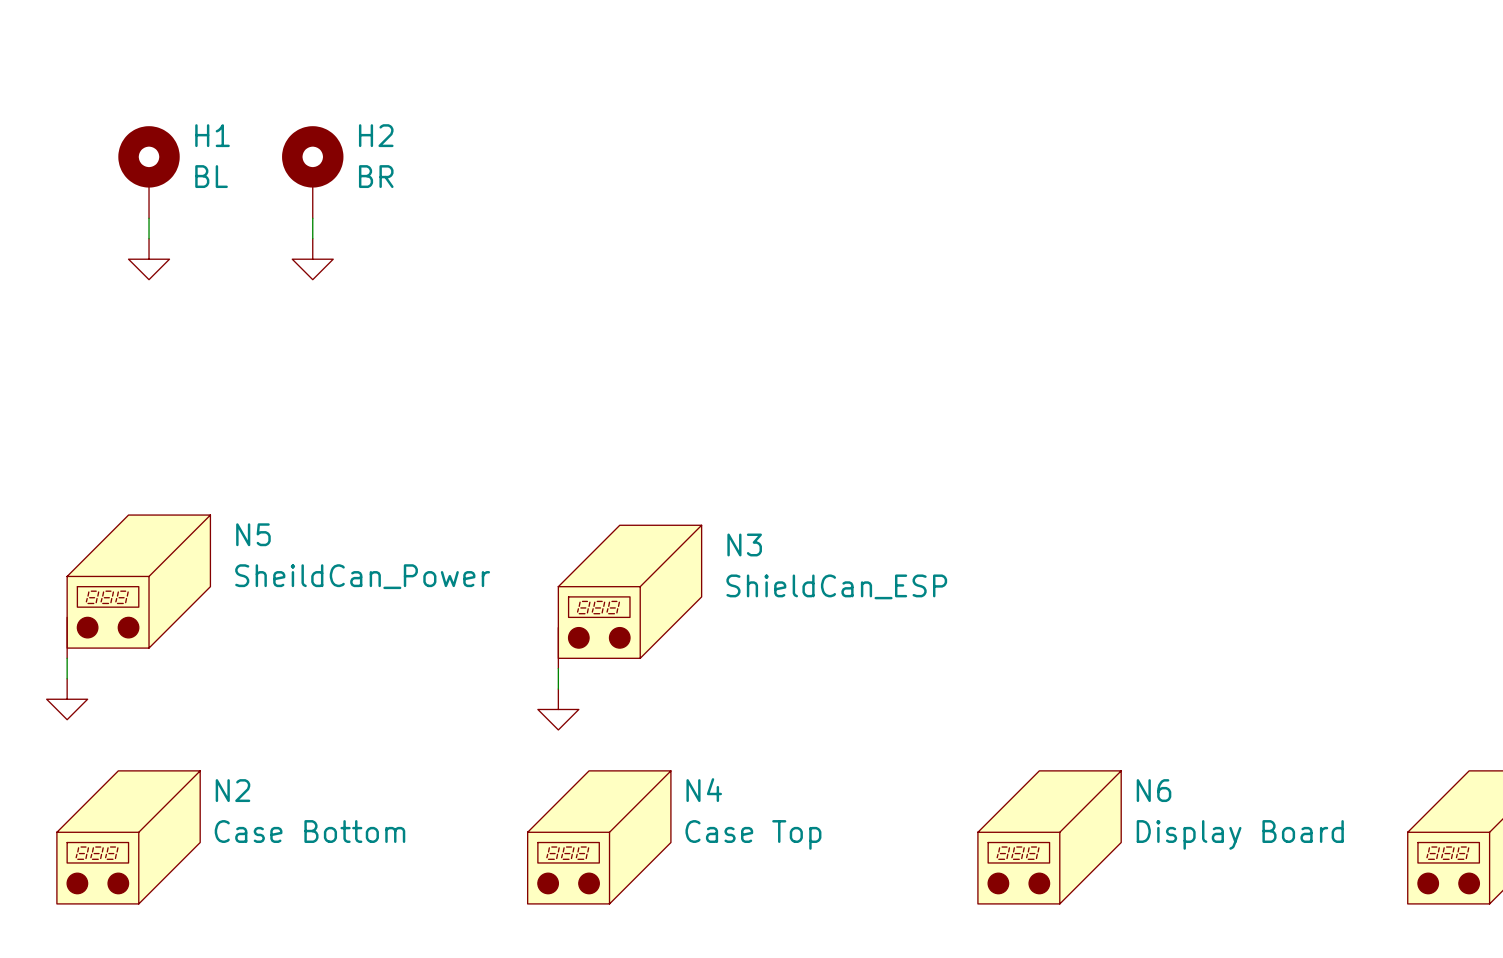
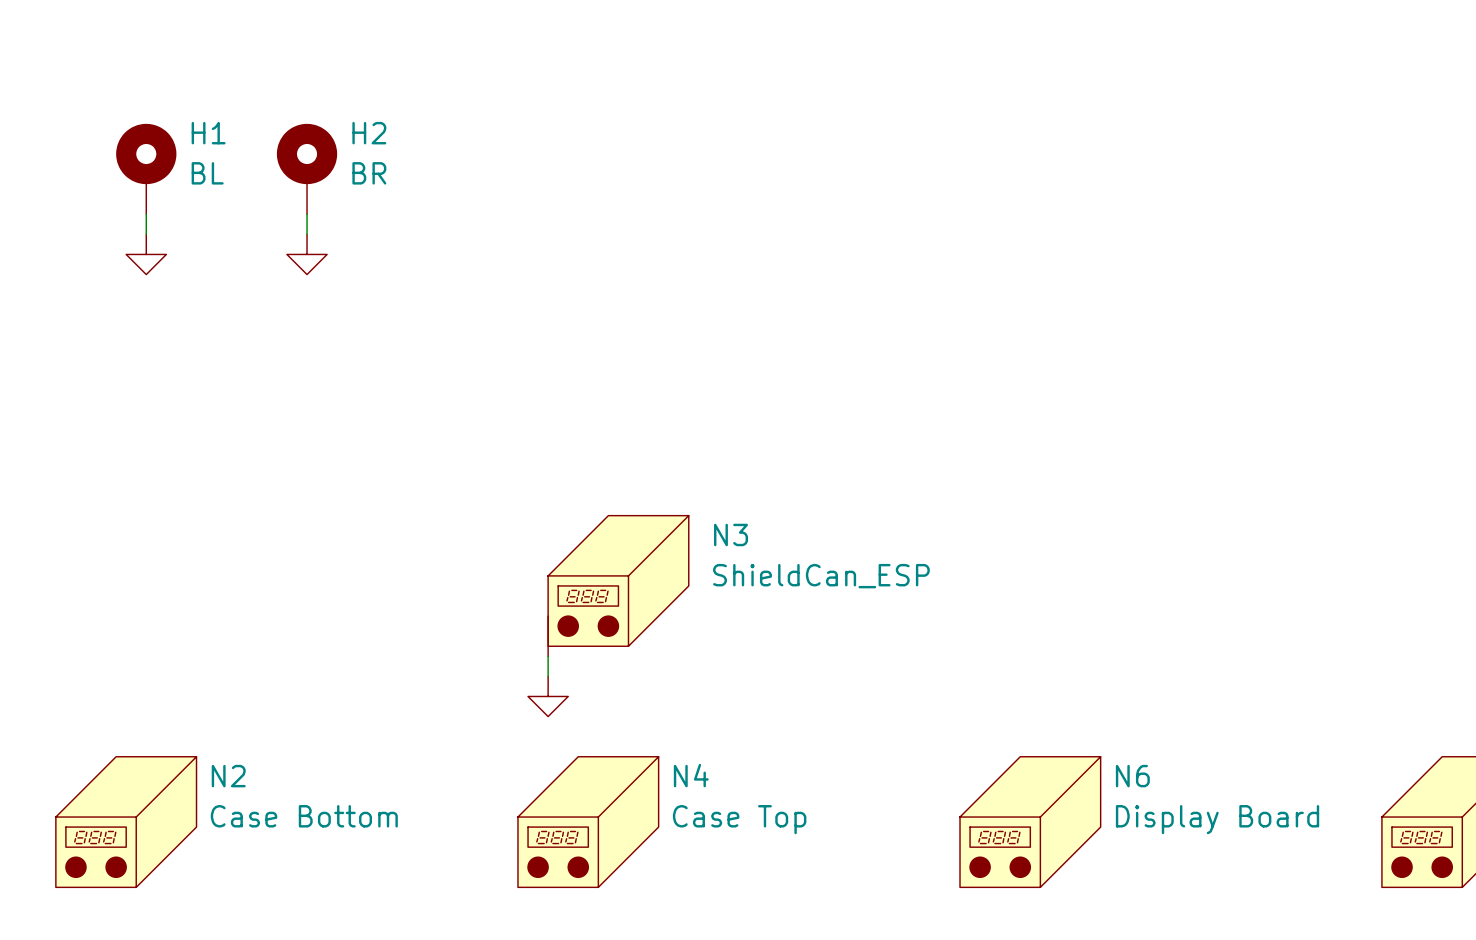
N5: SheildCan_Power (138, 586) -> none
wire: (67, 658) (67, 678) -> none
power symbol: (67, 699) -> none

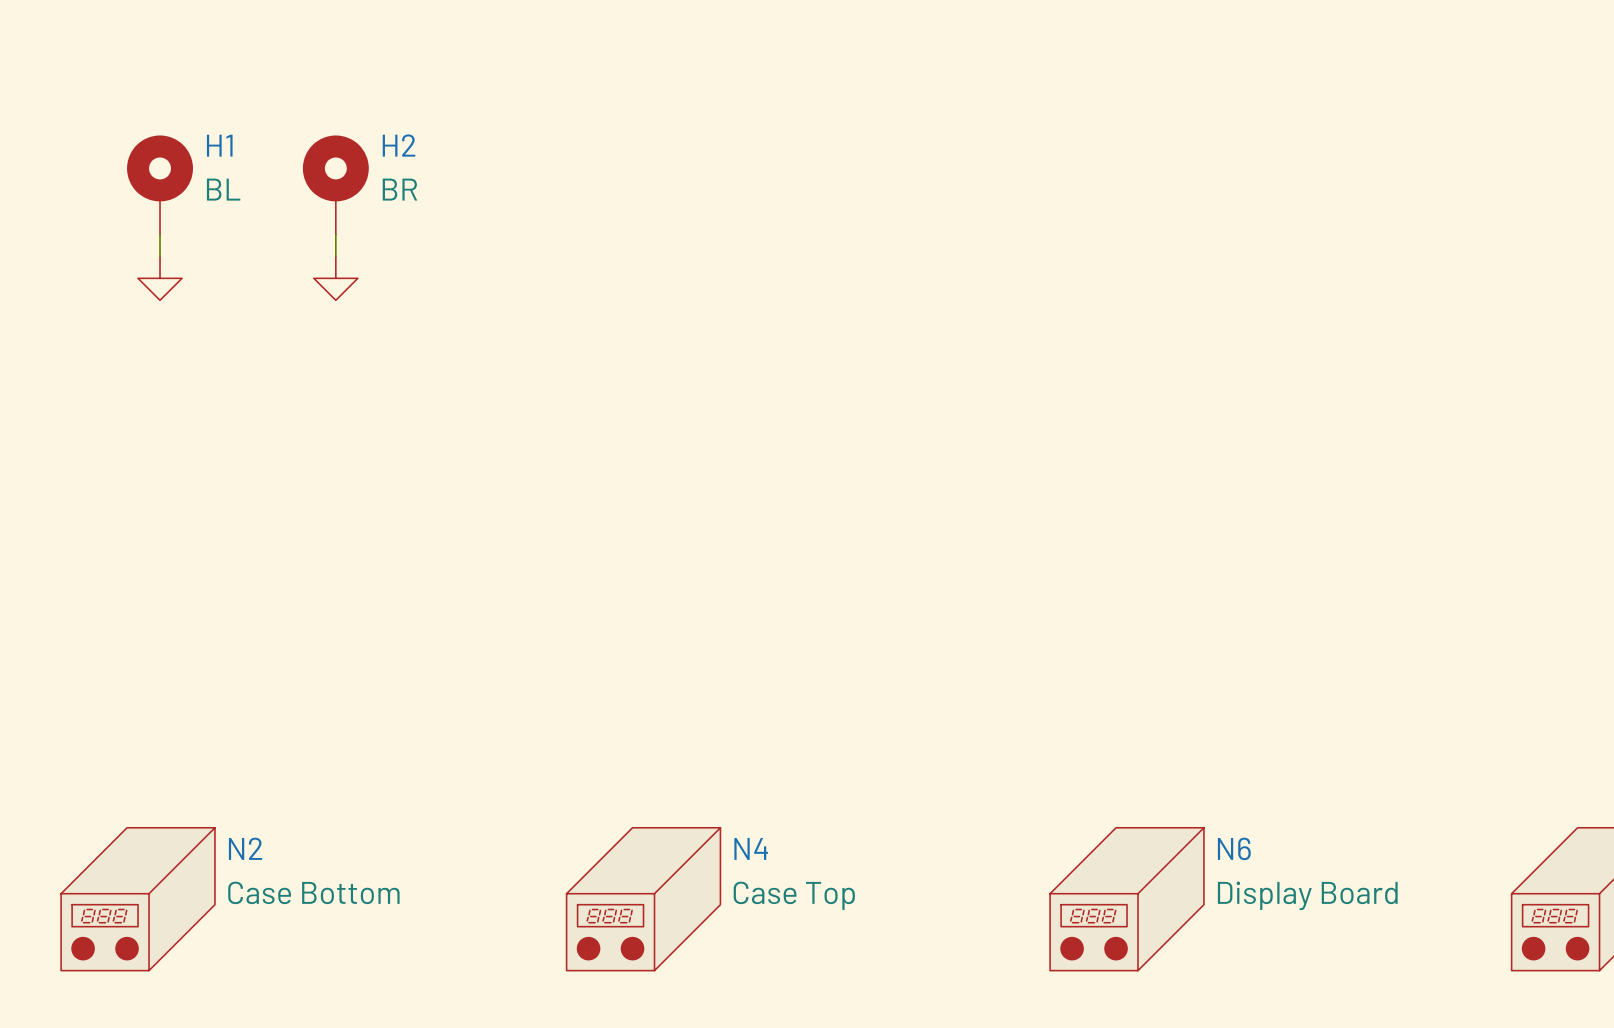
N3: ShieldCan_ESP (618, 585) -> none
wire: (548, 656) (548, 676) -> none
power symbol: (548, 696) -> none

